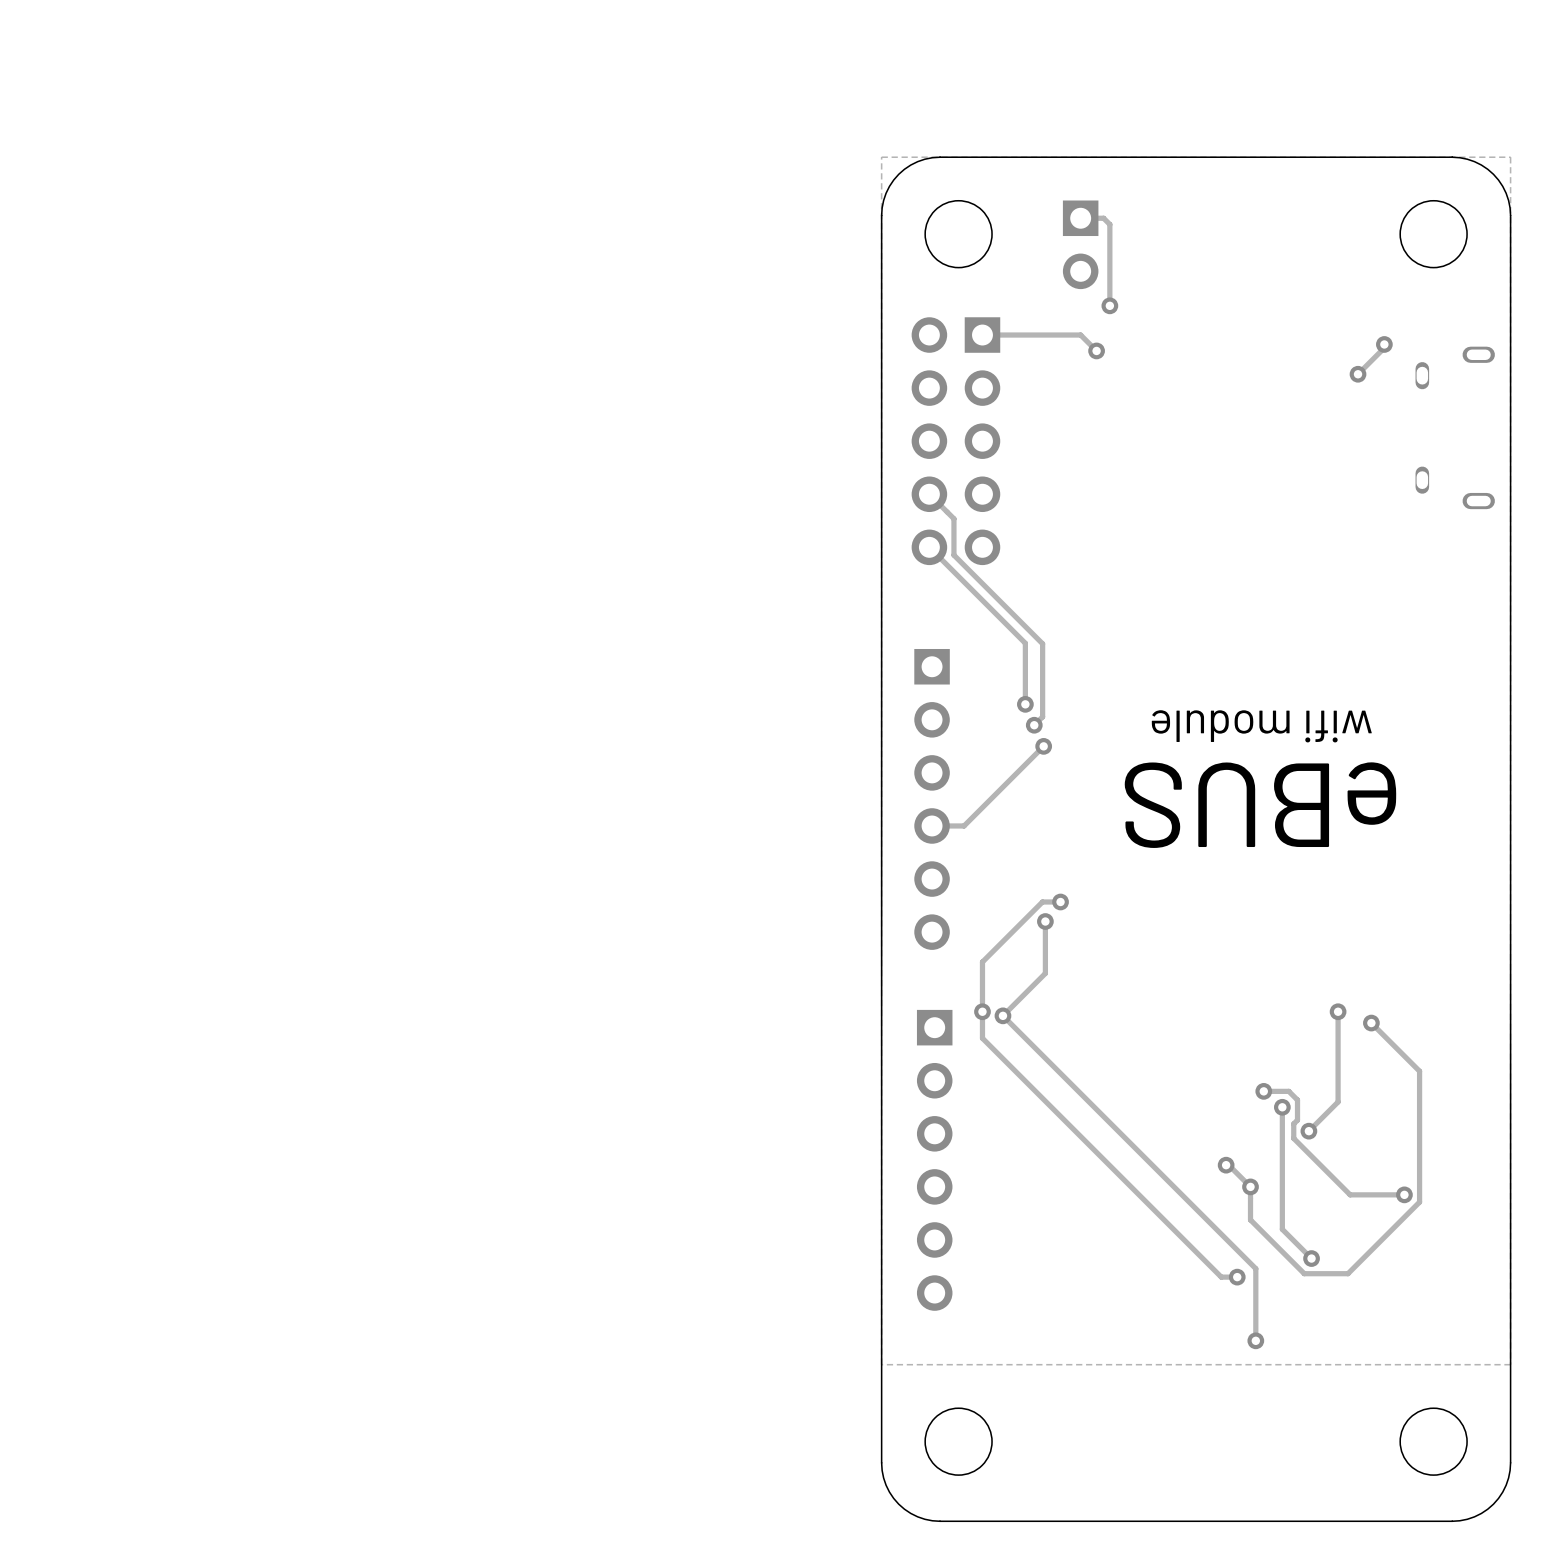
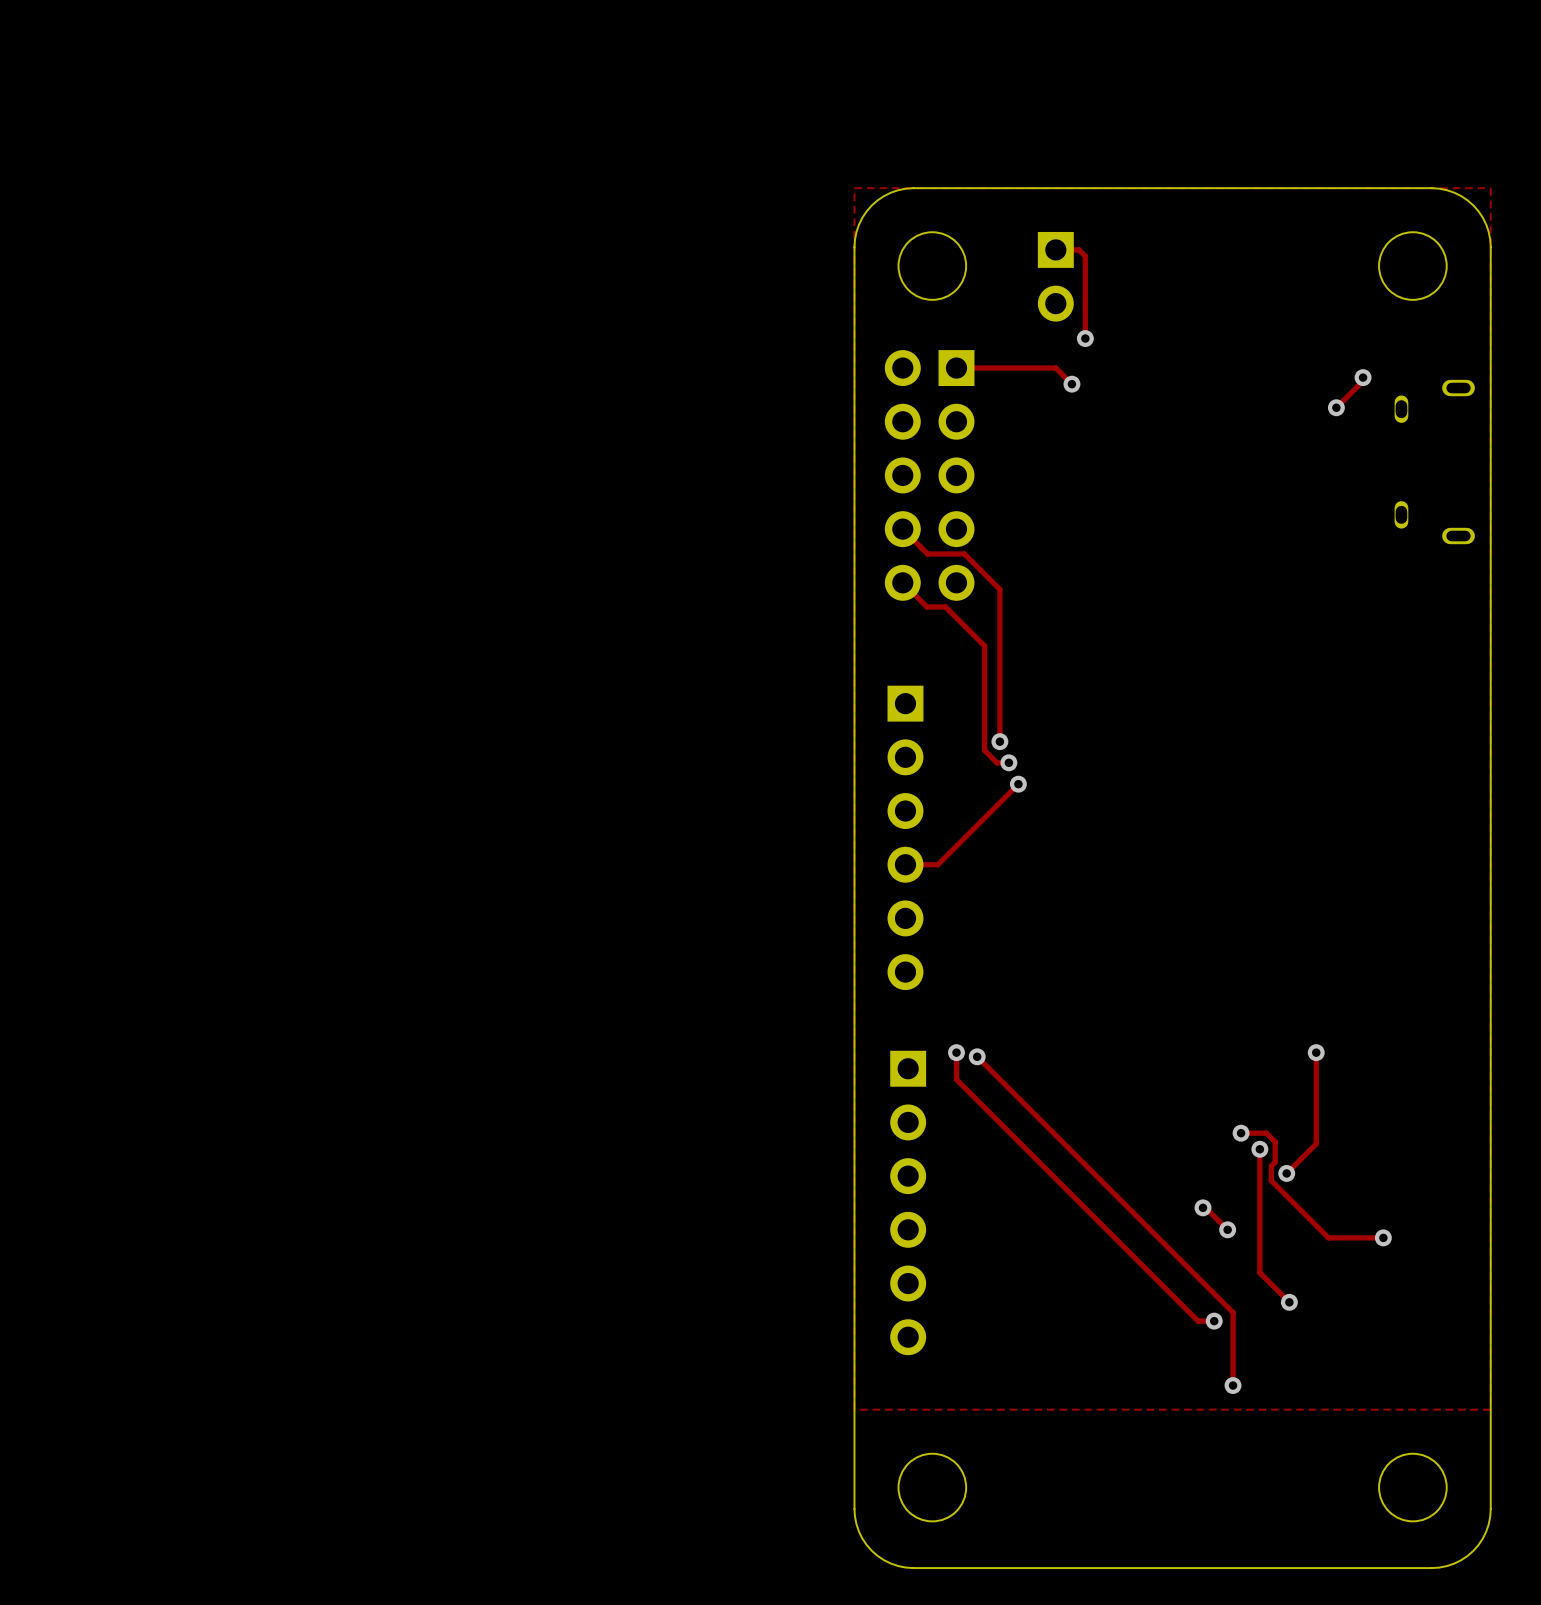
track: (953, 518) (953, 555) (1042, 643) (1042, 716) (1034, 725) -> (926, 606) (945, 606) (984, 646) (984, 750) (996, 762) (1008, 762)
track: (953, 571) (1025, 643) -> (927, 553) (964, 553) (999, 589) (999, 679)
text: wifi module (1261, 726) -> none
text: eBUS (1260, 805) -> none
track: (1060, 901) (1042, 901) (982, 962) (982, 1011) -> none
via: (1060, 901) -> none
track: (1045, 921) (1045, 973) (1002, 1015) -> none
via: (1045, 921) -> none
track: (1371, 1023) (1419, 1071) (1419, 1202) (1348, 1273) (1304, 1273) (1250, 1219) (1250, 1186) -> none
via: (1371, 1023) -> none

